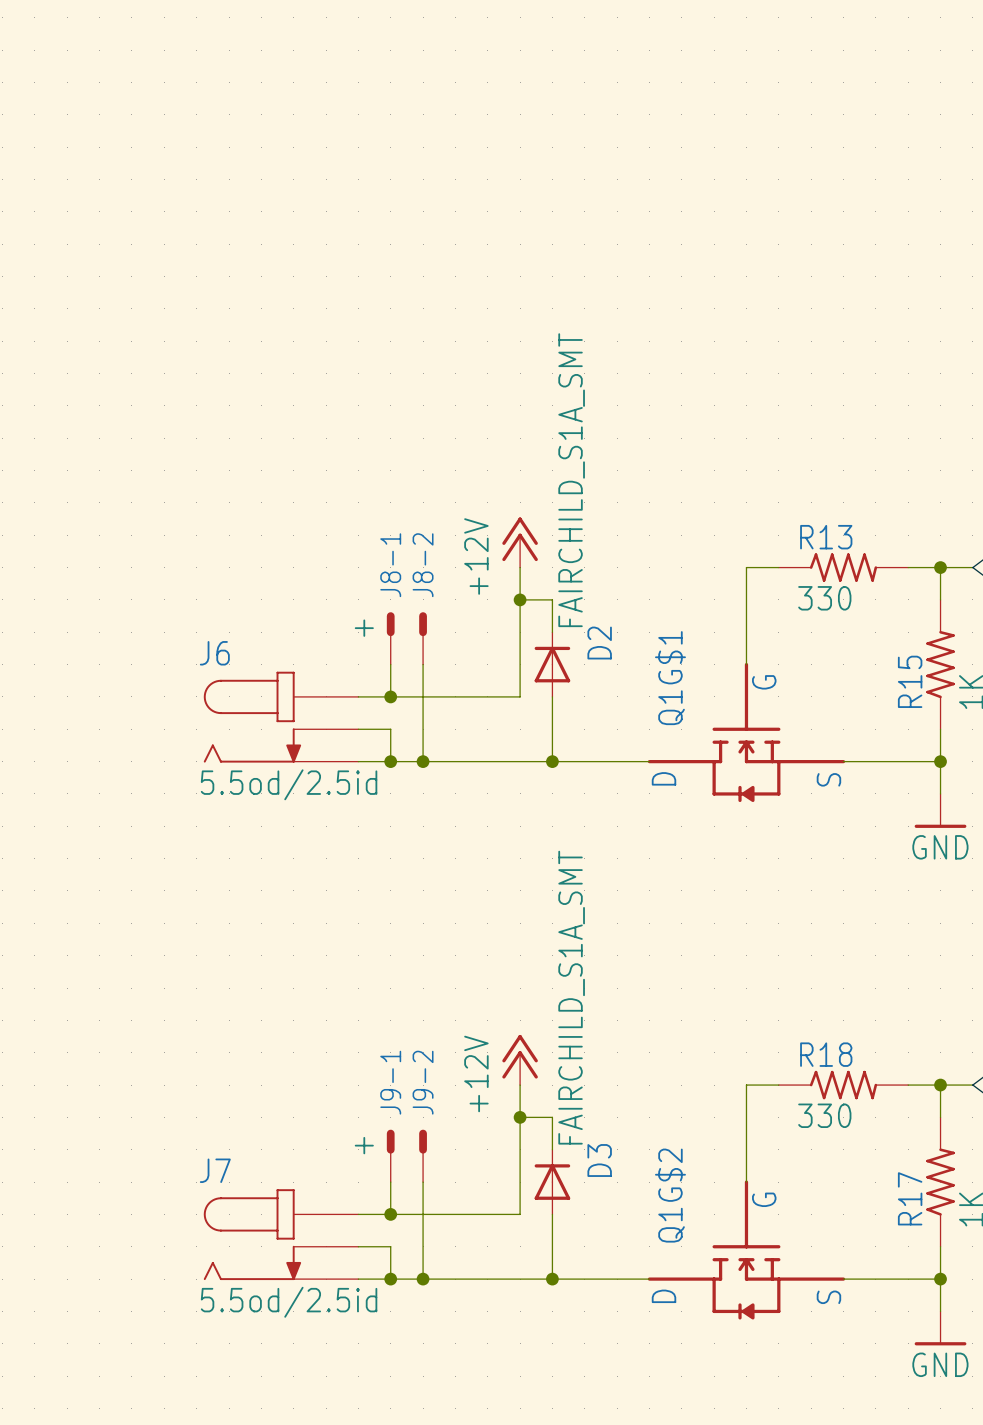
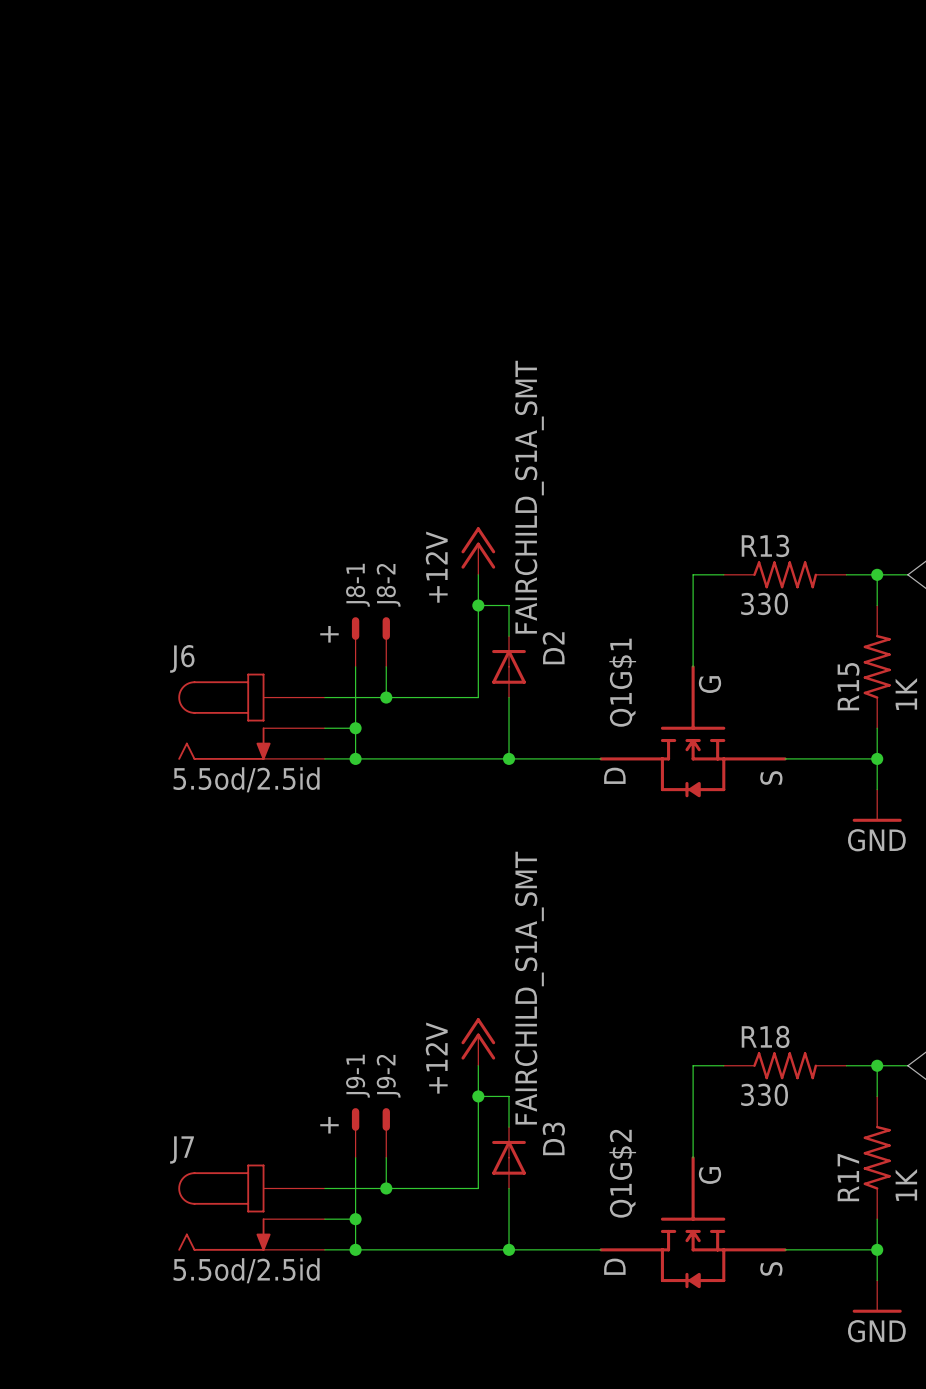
wire: none -> (355, 697) (355, 728)
junction: (390, 696) -> none
wire: (423, 696) (423, 761) -> none
junction: none -> (386, 697)
junction: none -> (355, 728)
junction: (423, 761) -> none
wire: none -> (355, 1188) (355, 1219)
junction: (390, 1214) -> none
wire: (423, 1214) (423, 1279) -> none
junction: none -> (386, 1188)
junction: none -> (355, 1219)
junction: (423, 1279) -> none

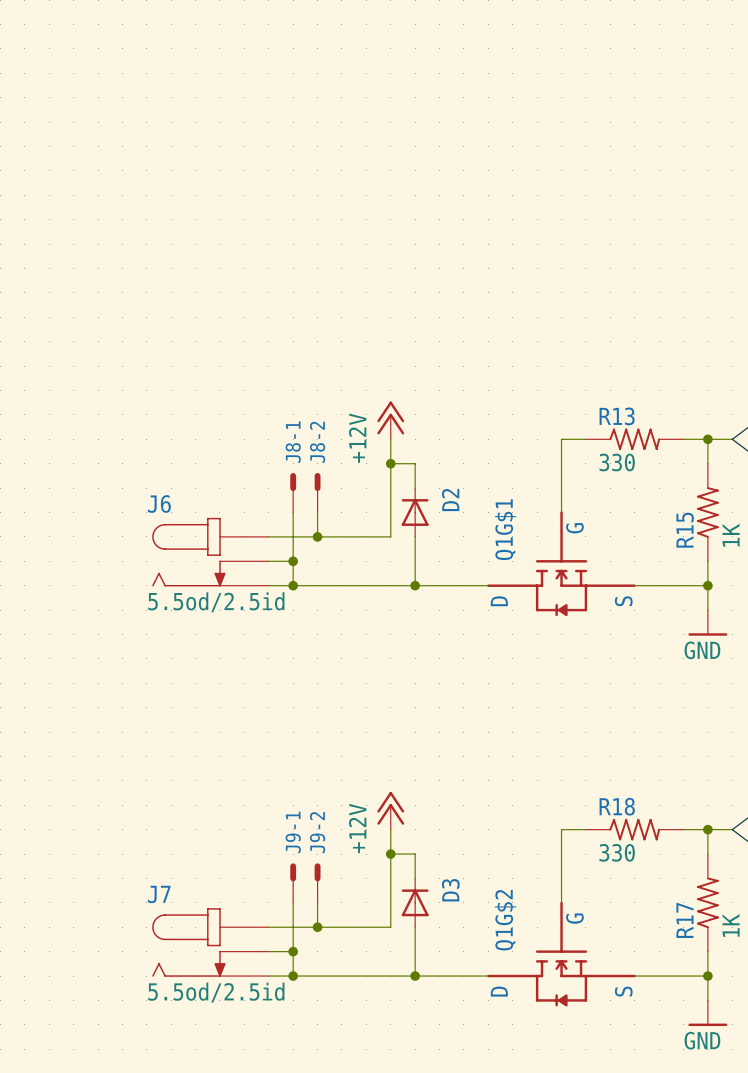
D2 value: FAIRCHILD_S1A_SMT (529, 497) -> none
J8-1 value: + (329, 634) -> none
D3 value: FAIRCHILD_S1A_SMT (529, 988) -> none
J9-1 value: + (329, 1125) -> none

